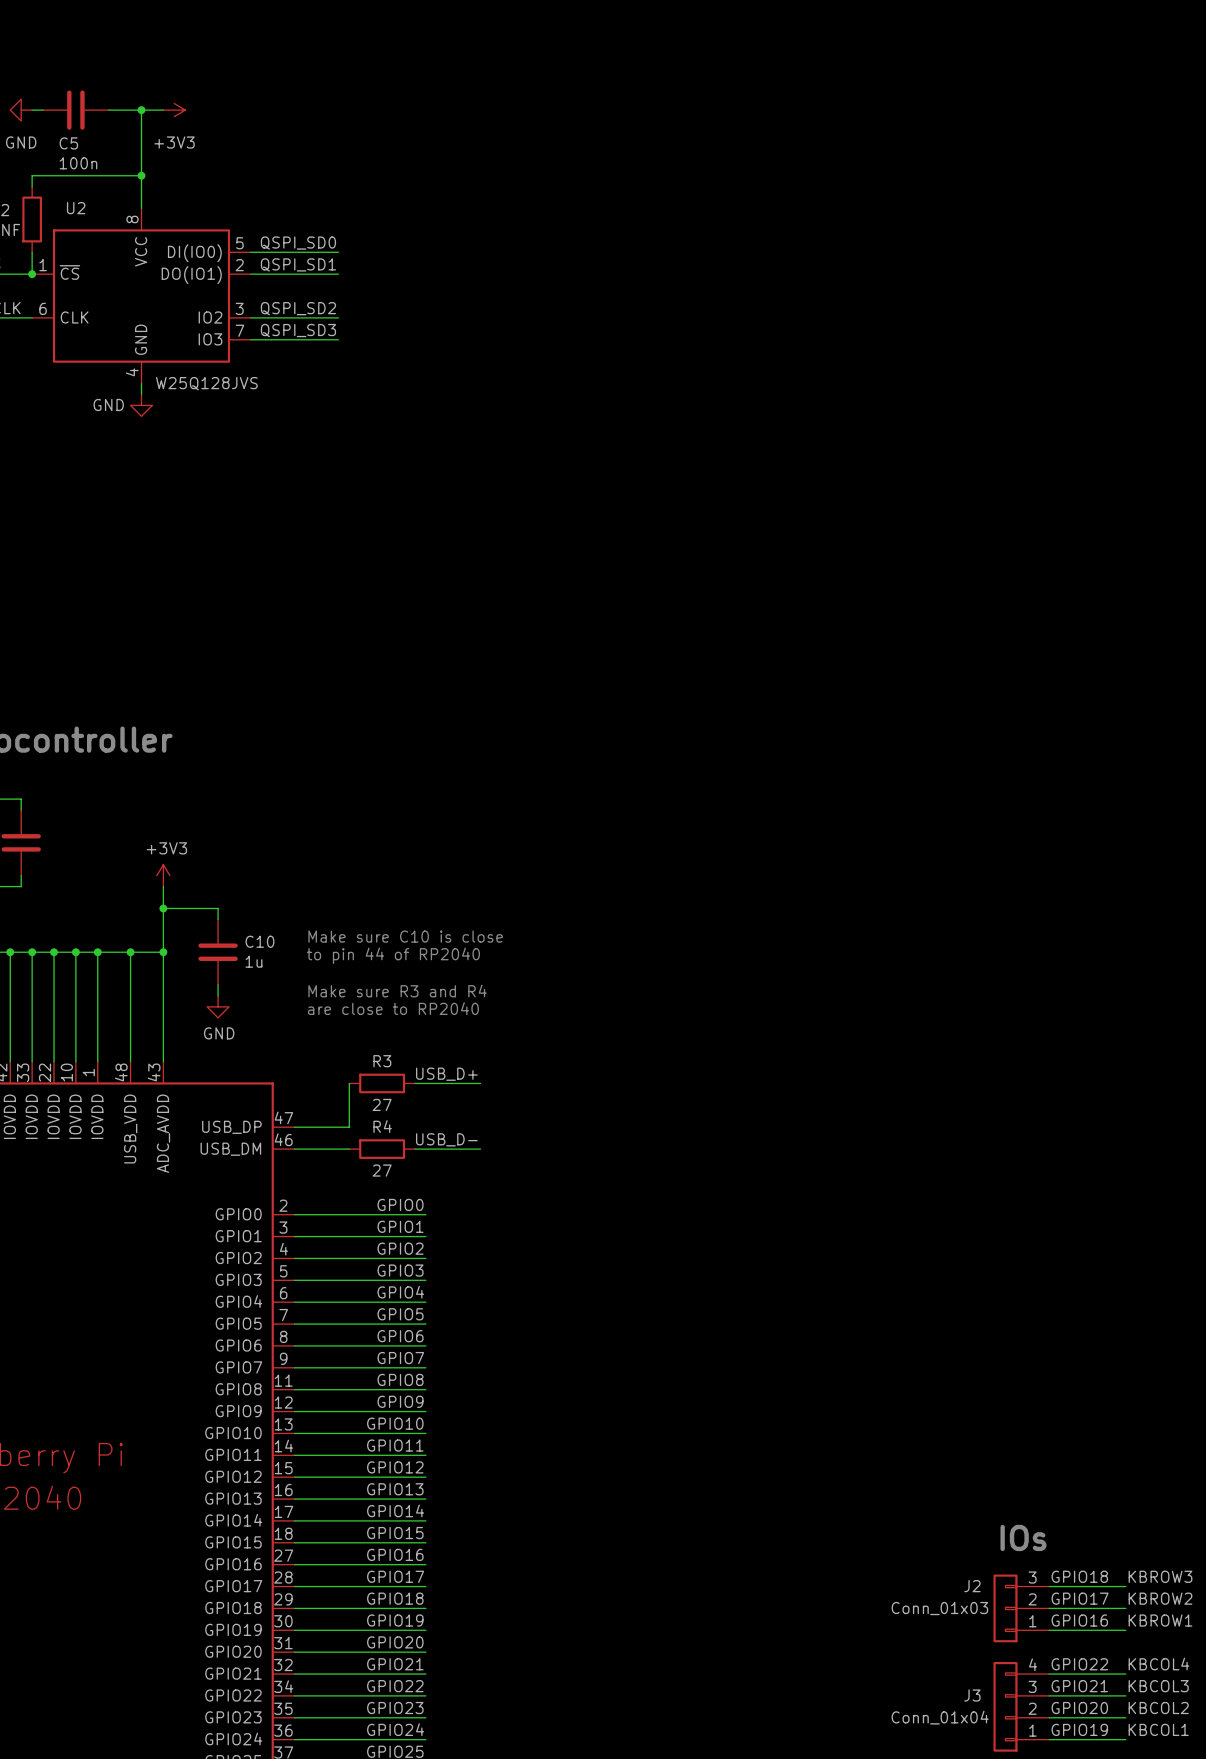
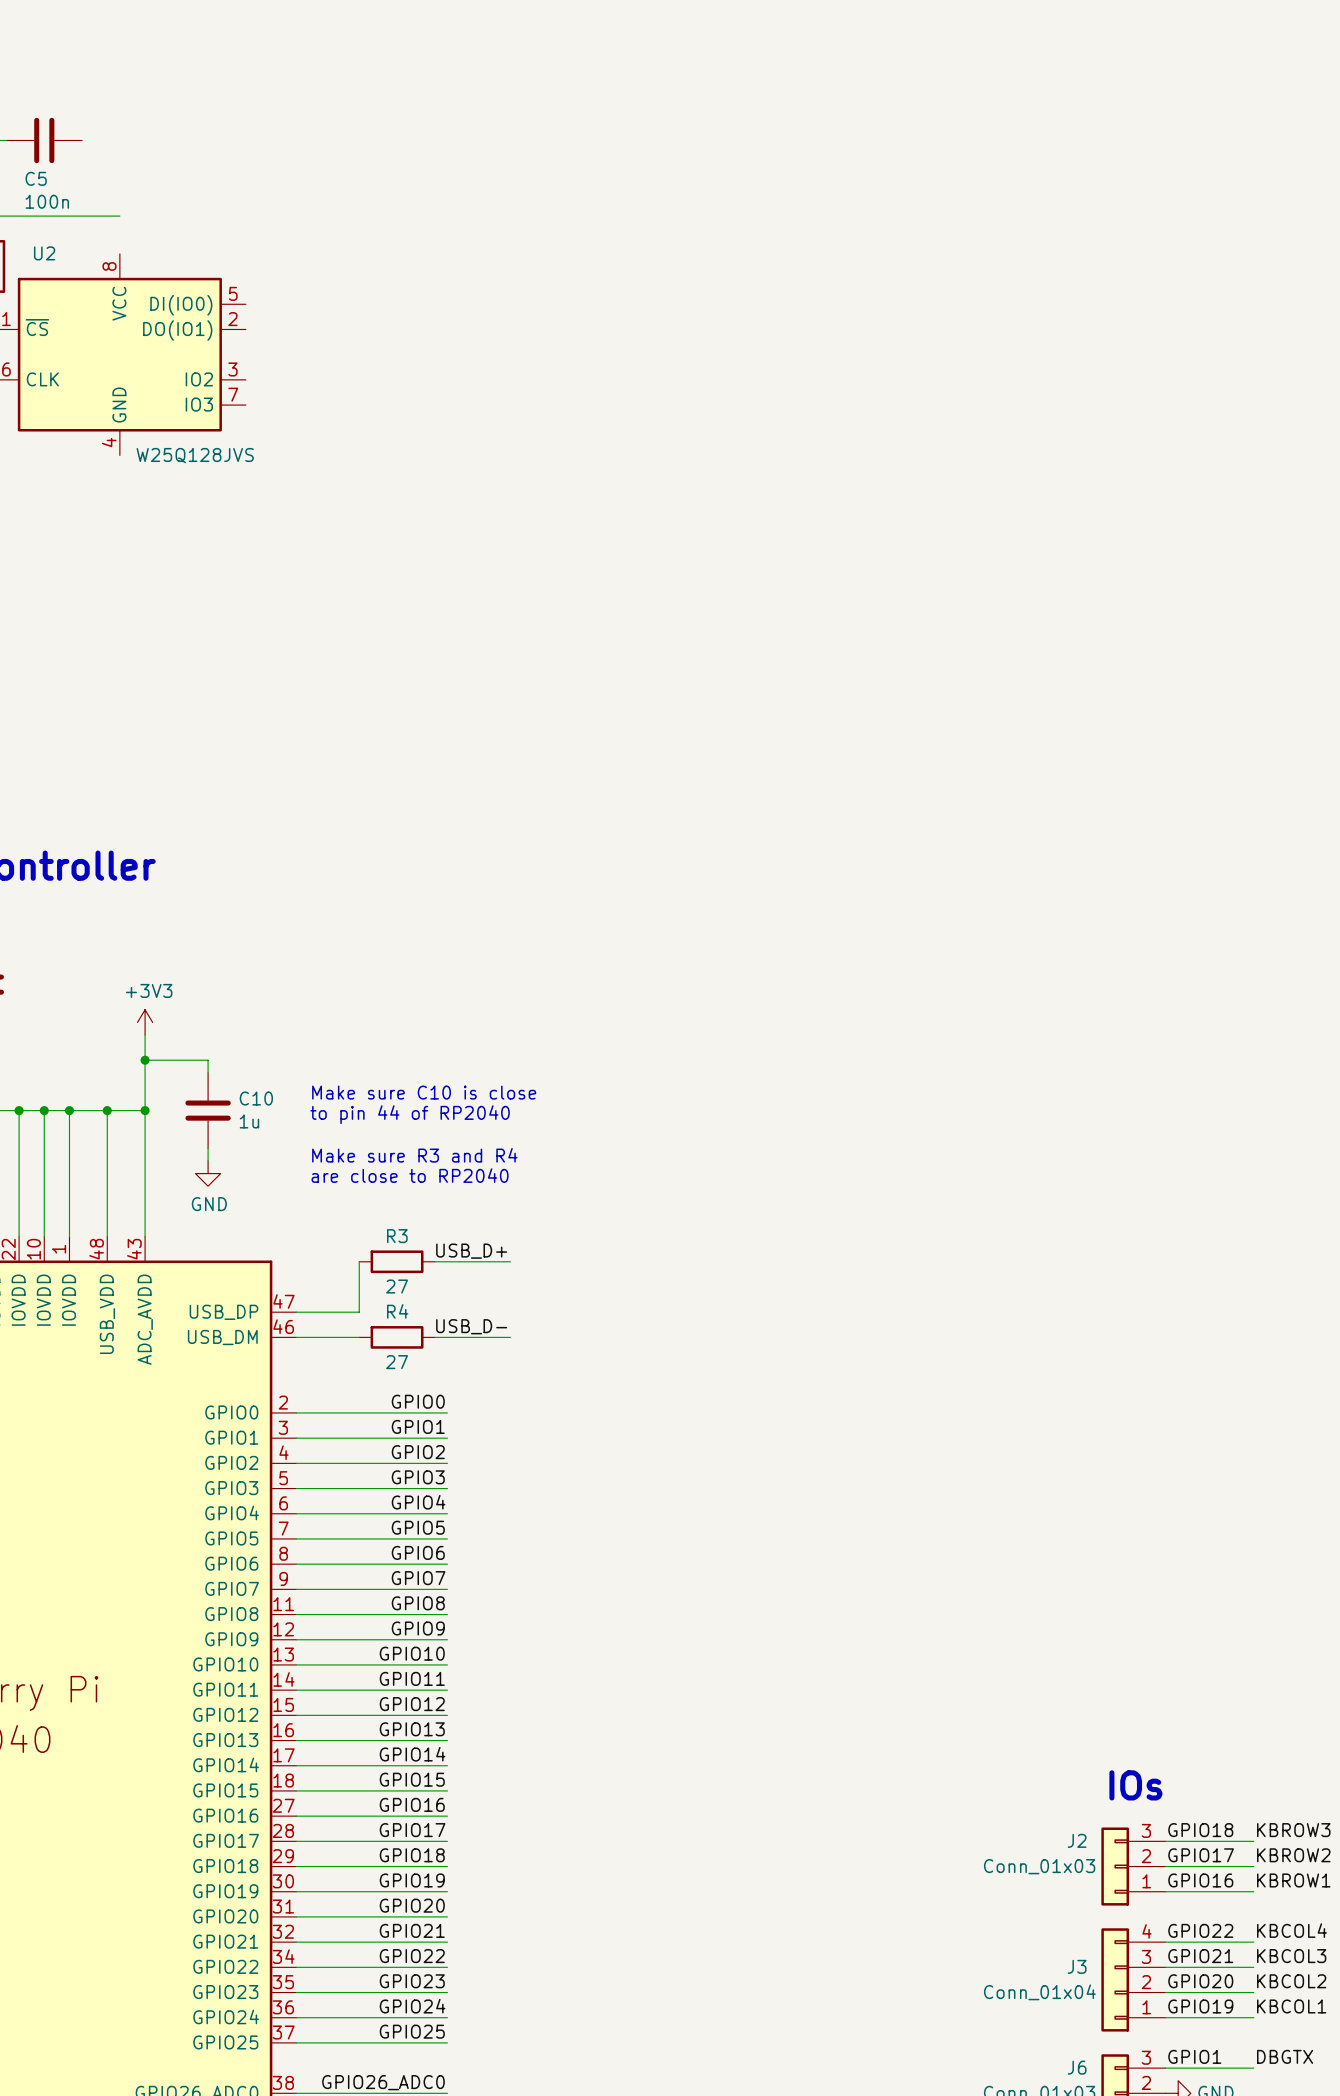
wire: (108, 110) (163, 110) -> none
wire: (141, 110) (141, 208) -> none
junction: (141, 110) -> none
power symbol: +3V3 (174, 110) -> none
junction: (141, 175) -> none
label: QSPI_SD0 (298, 243) -> none
wire: (250, 252) (338, 252) -> none
label: QSPI_SD1 (298, 264) -> none
wire: (250, 274) (338, 274) -> none
label: QSPI_SD2 (298, 308) -> none
wire: (250, 317) (338, 317) -> none
label: QSPI_SD3 (298, 330) -> none
wire: (250, 339) (338, 339) -> none
wire: (141, 383) (141, 394) -> none
power symbol: GND (141, 405) -> none

